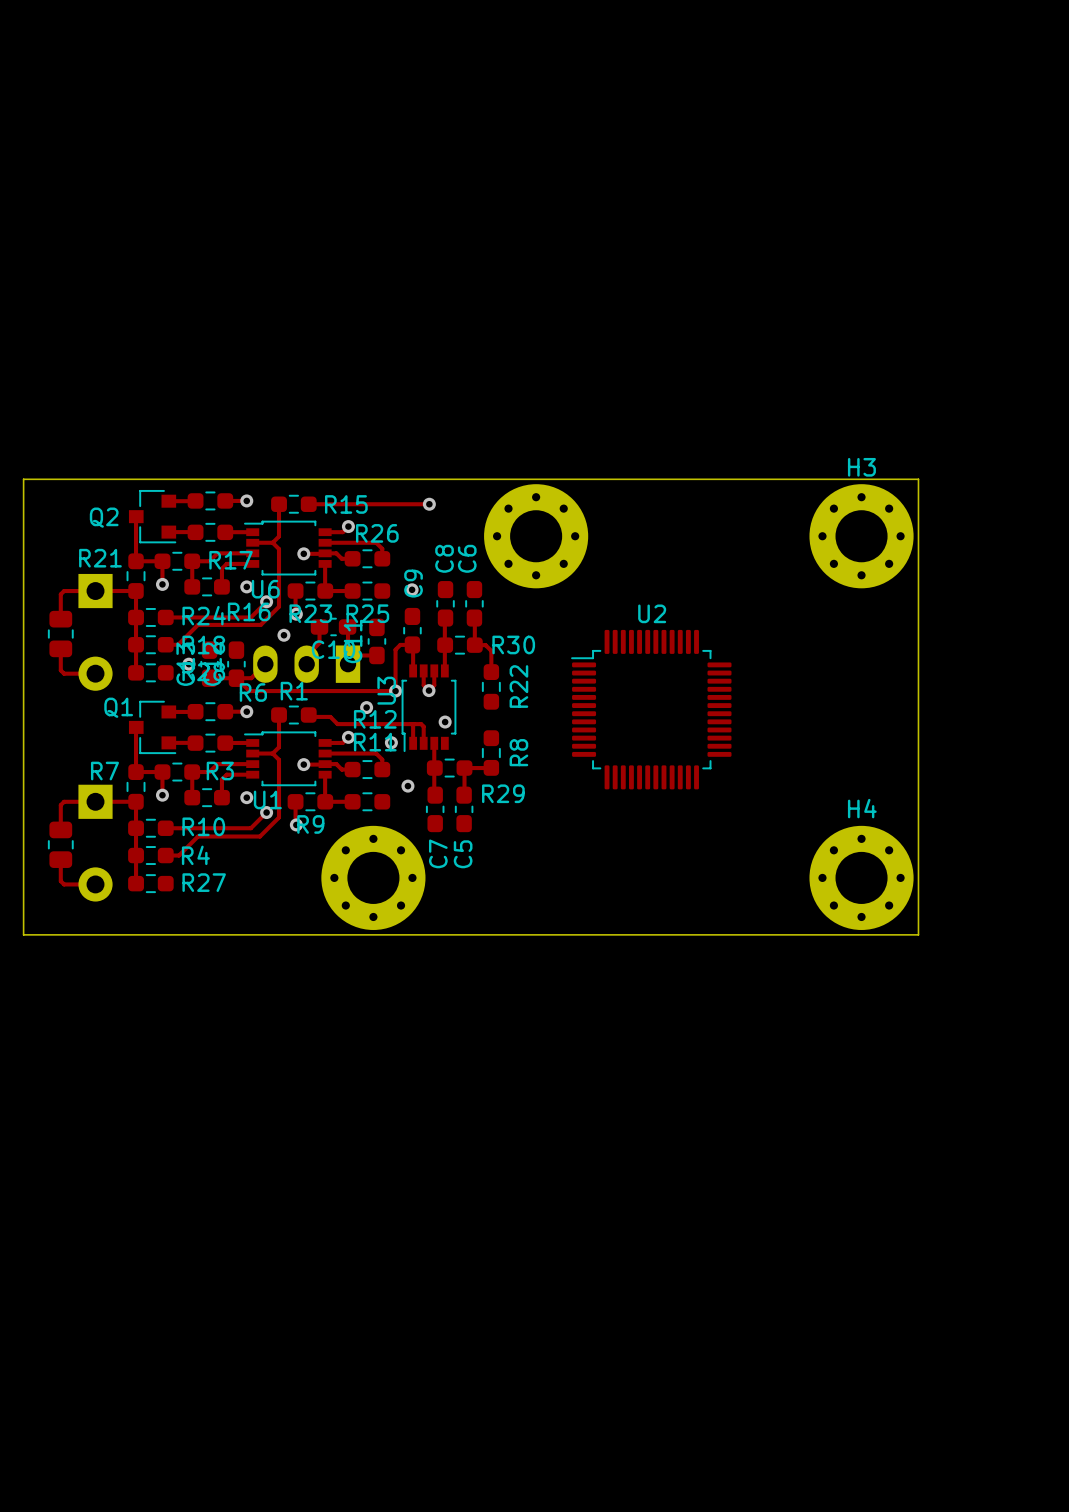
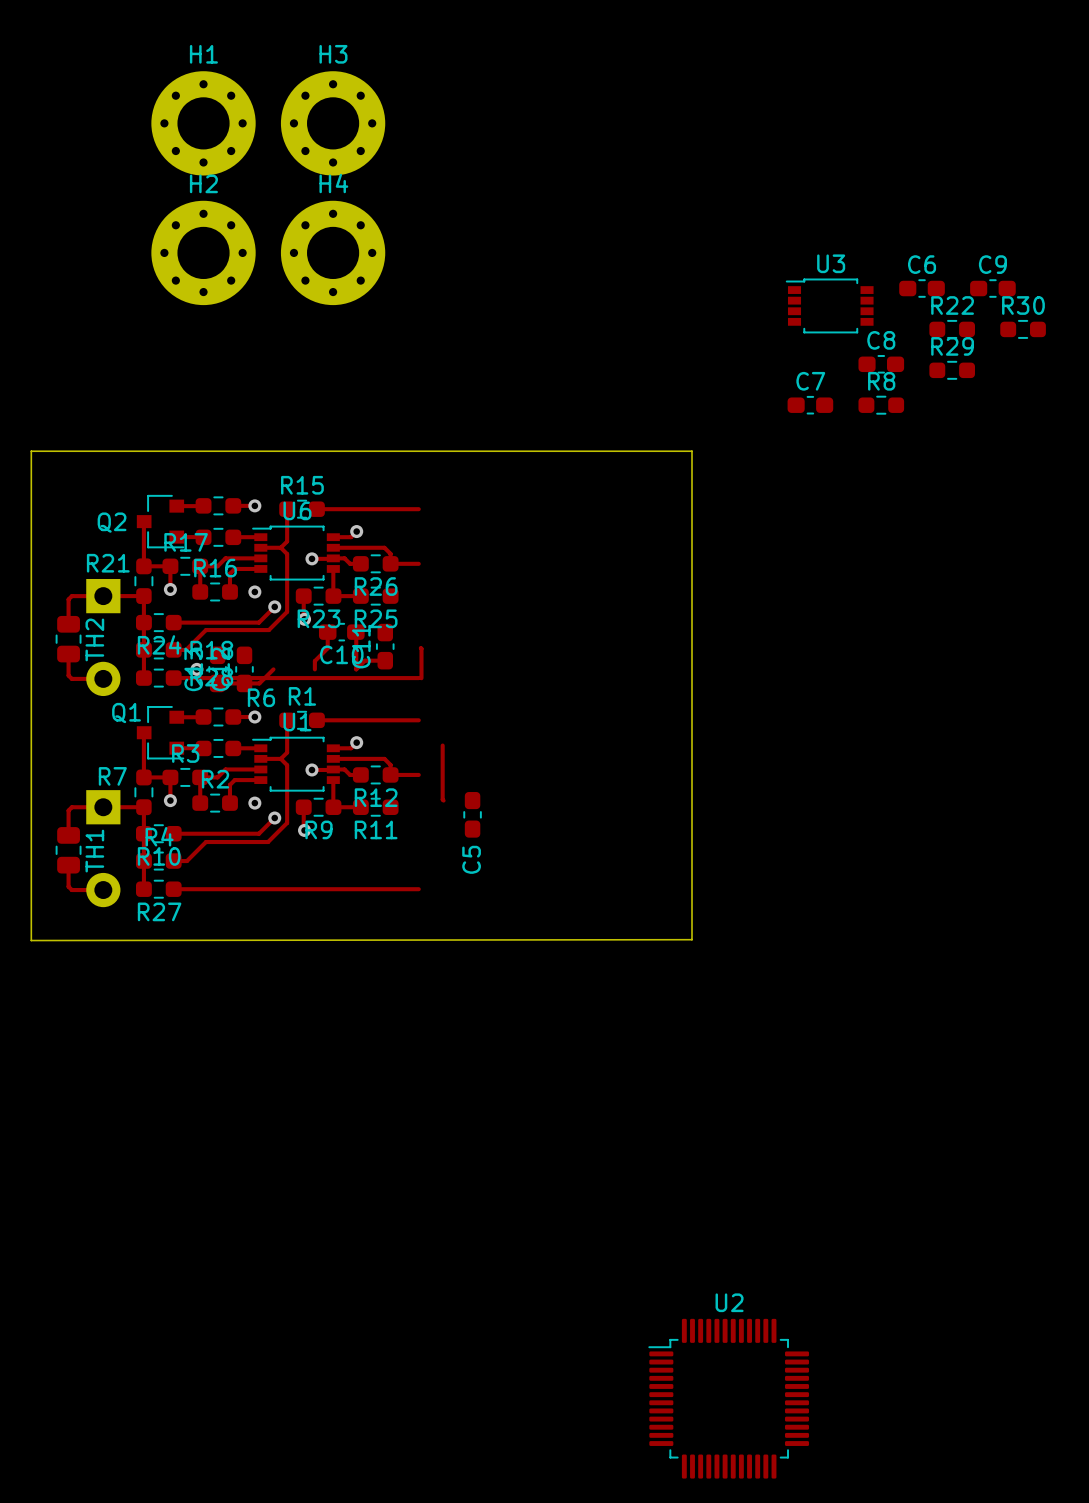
H1: none -> (203, 123)
H2: none -> (203, 252)
board edge: (23, 479) (918, 479) (918, 934) (23, 934) -> (31, 484) (31, 451) (692, 451) (692, 939) (31, 940)
R15 name position: R15 (346, 504) -> R15 (302, 485)
track: (410, 504) (429, 504) -> none
via: (429, 504) -> none
R26 name position: R26 (377, 533) -> R26 (376, 586)
part: (536, 536) -> none
H3 position: (861, 536) -> (333, 123)
track: none -> (390, 563) (418, 563)
R17 name position: R17 (231, 560) -> R17 (186, 542)
U6 name position: U6 (265, 589) -> U6 (297, 510)
via: (412, 589) -> none
C8 rotation: 0° (445, 603) -> 90° clockwise (881, 364)
C8 position: (445, 603) -> (881, 364)
C6 rotation: 0° (474, 603) -> 90° clockwise (922, 288)
C6 position: (474, 603) -> (922, 288)
R16 name position: R16 (249, 611) -> R16 (215, 568)
R24 name position: R24 (204, 615) -> R24 (159, 644)
track: (445, 618) (444, 673) -> none
track: (474, 618) (474, 645) (485, 645) (491, 650) (491, 672) -> none
C9 rotation: 0° (412, 630) -> 90° clockwise (992, 288)
C9 position: (412, 630) -> (992, 288)
TH2 name: none -> TH2 (94, 639)
via: (283, 635) -> none
track: (412, 644) (400, 644) (395, 649) (395, 691) (249, 691) (236, 678) -> none
R30 name position: R30 (513, 644) -> R30 (1023, 305)
R30 position: (459, 645) -> (1023, 329)
part: (306, 664) -> none
track: (423, 670) (423, 685) (428, 690) (434, 685) (434, 670) -> none
track: none -> (173, 678) (418, 678)
R22 rotation: 0° (491, 686) -> 90° clockwise (952, 329)
R22 position: (491, 686) -> (952, 329)
R22 name position: R22 (518, 686) -> R22 (952, 305)
via: (428, 690) -> none
via: (395, 691) -> none
via: (366, 707) -> none
U3 rotation: 0° (428, 708) -> 90° clockwise (829, 305)
U3 position: (428, 708) -> (829, 305)
U2 position: (651, 709) -> (728, 1398)
track: none -> (316, 720) (418, 720)
track: (310, 716) (330, 716) (337, 724) (421, 724) (423, 726) (423, 743) -> none
R12 name position: R12 (375, 719) -> R12 (376, 797)
via: (445, 722) -> none
track: (413, 724) (413, 743) -> none
R11 name position: R11 (375, 742) -> R11 (376, 829)
via: (391, 742) -> none
R8 name position: R8 (518, 752) -> R8 (881, 381)
R8 rotation: 0° (491, 753) -> 90° clockwise (881, 405)
R8 position: (491, 753) -> (881, 405)
R29 position: (449, 768) -> (952, 370)
track: (490, 768) (464, 768) (464, 795) -> none
track: none -> (390, 774) (418, 774)
R3 name position: R3 (220, 771) -> R3 (185, 753)
R2 name: none -> R2 (215, 779)
via: (407, 786) -> none
R29 name position: R29 (503, 793) -> R29 (952, 346)
U1 name position: U1 (267, 799) -> U1 (297, 722)
C7 rotation: 0° (435, 809) -> 90° clockwise (810, 405)
C7 position: (435, 809) -> (810, 405)
R10 name position: R10 (203, 826) -> R10 (159, 856)
TH1 name: none -> TH1 (94, 851)
C7 name position: C7 (438, 853) -> C7 (810, 381)
R4 name position: R4 (195, 855) -> R4 (159, 836)
part: (373, 877) -> none
H4 position: (861, 877) -> (333, 252)
R27 name position: R27 (204, 882) -> R27 (159, 911)
track: none -> (173, 889) (418, 889)

